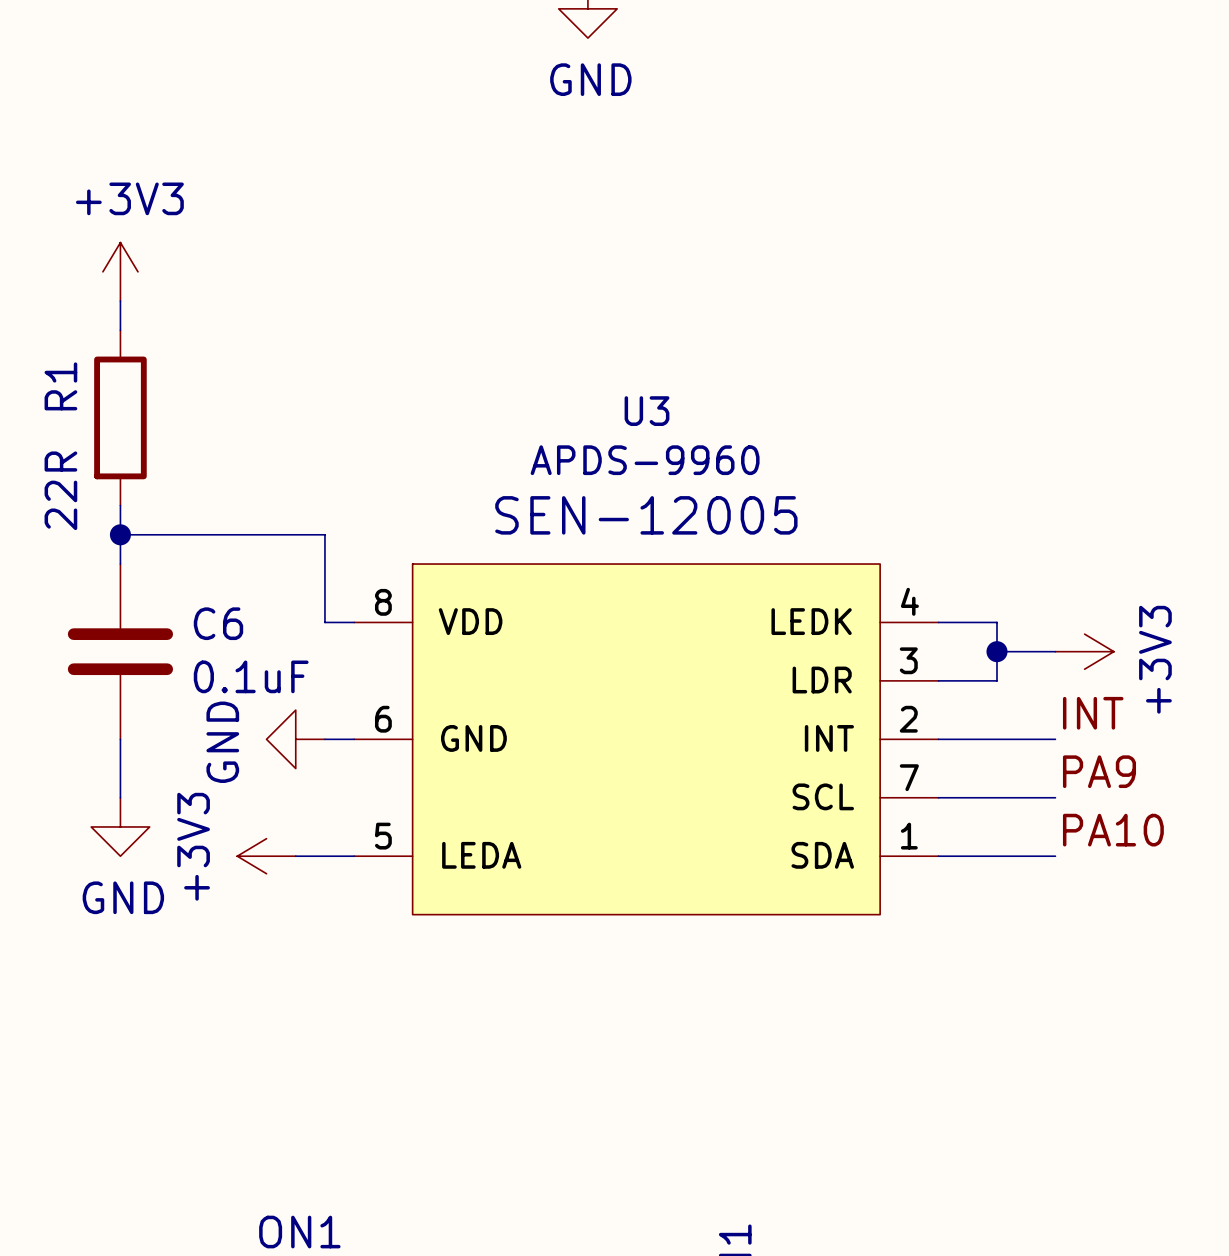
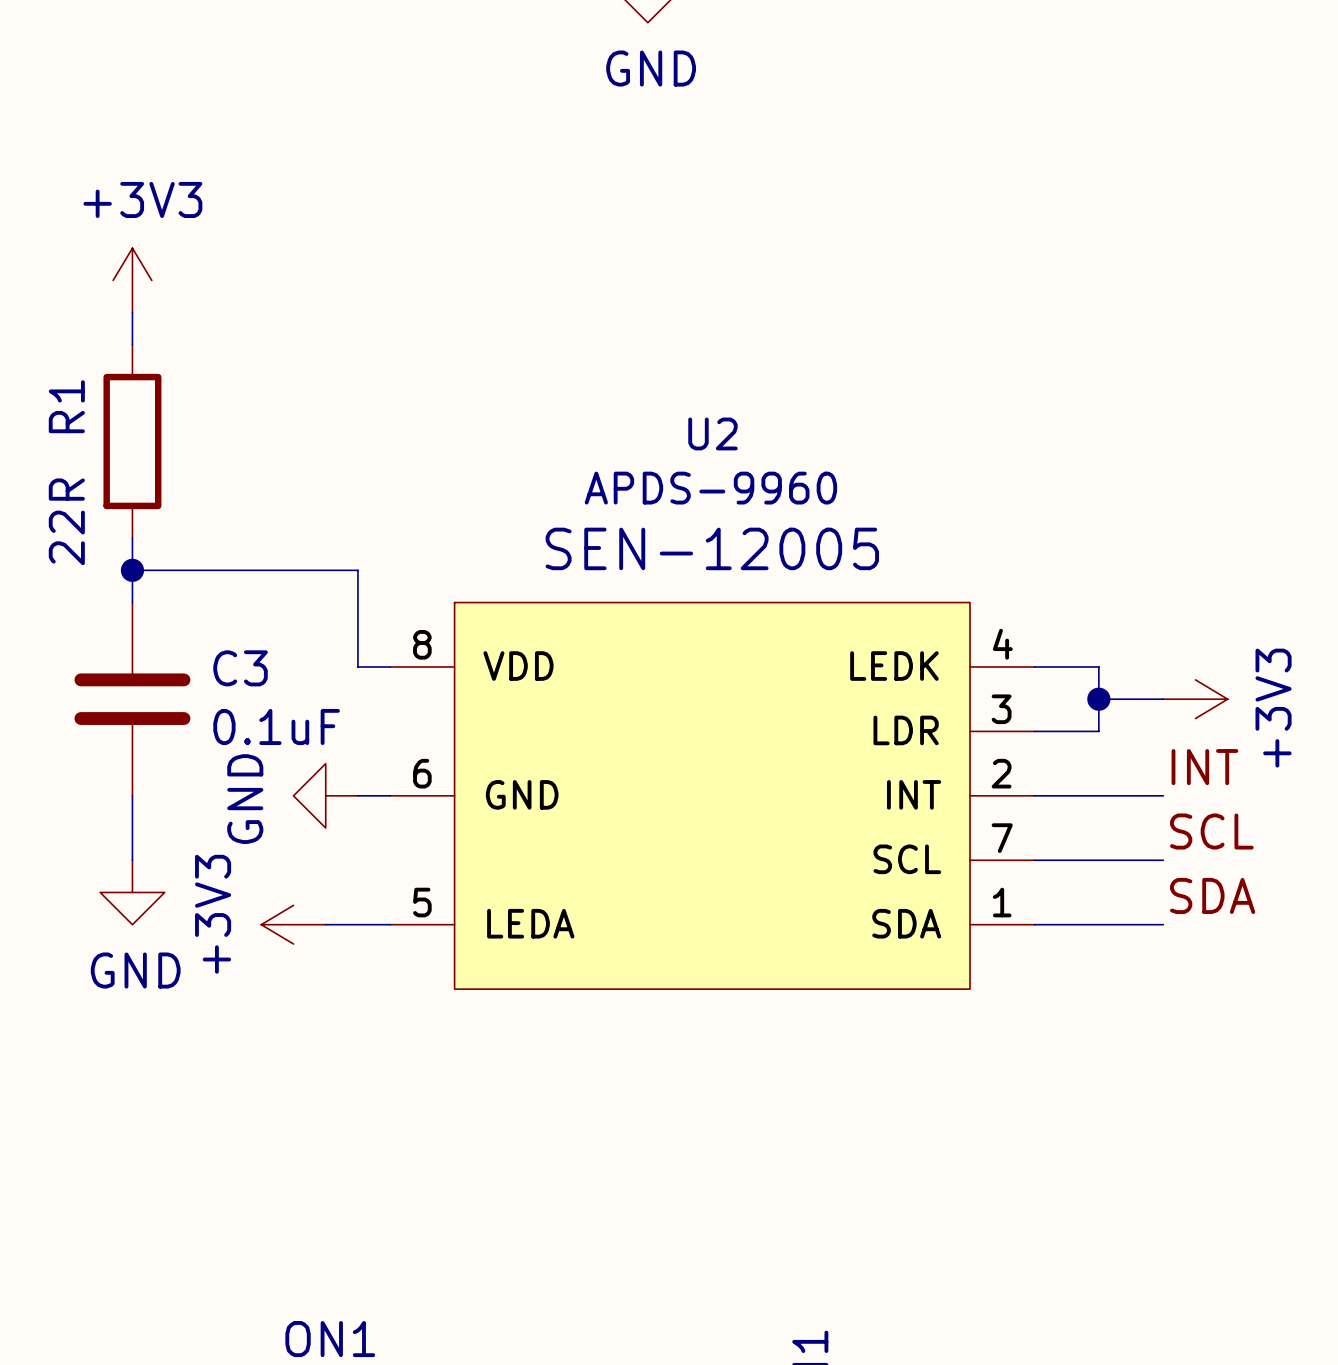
U3 name: U3 (647, 411) -> U2 (712, 433)
C6 name: C6 (218, 623) -> C3 (240, 668)
label: PA9 (1099, 771) -> SCL (1211, 831)
label: PA10 (1113, 830) -> SDA (1212, 895)

